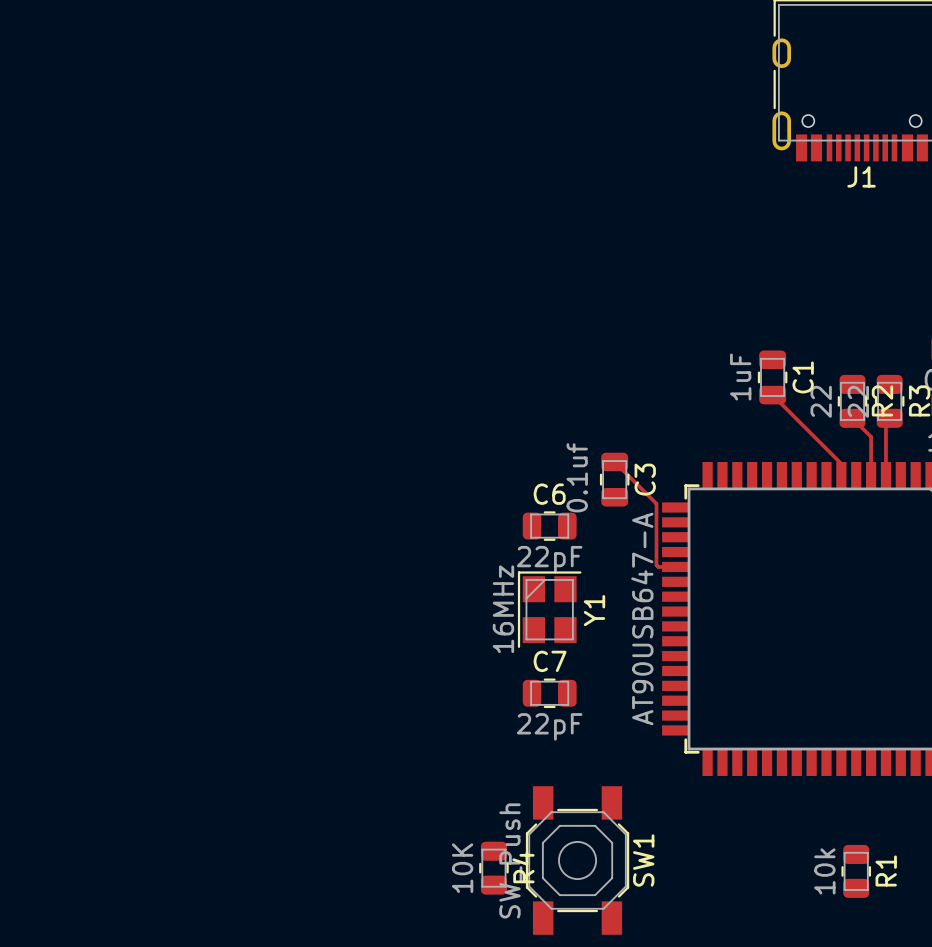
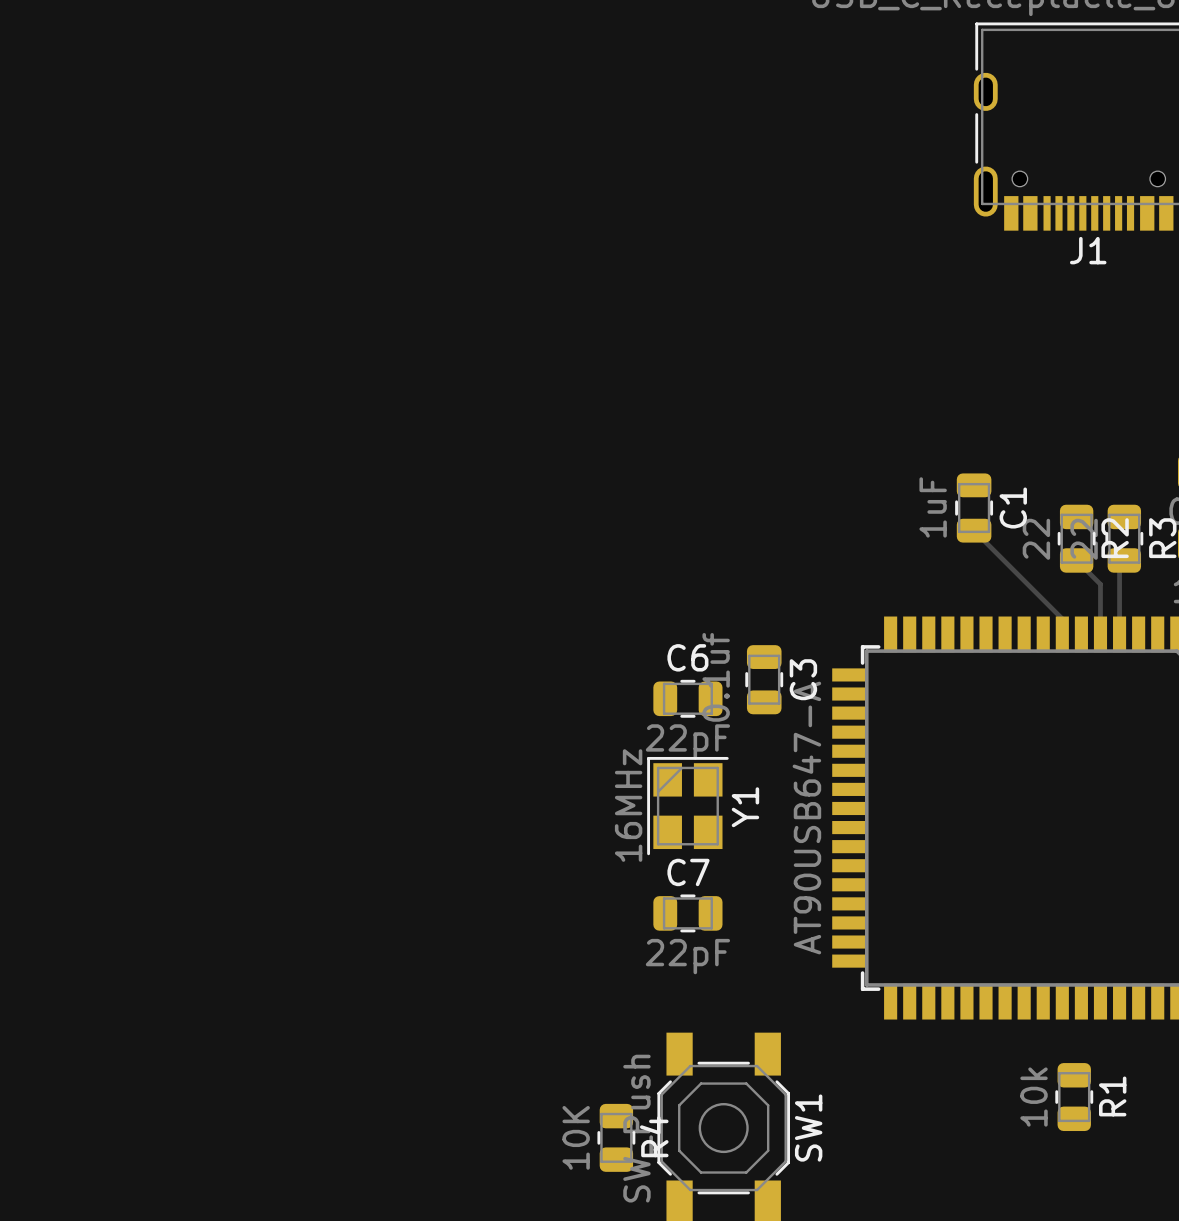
track: (614, 461) (656, 503) (656, 565) (658, 566) (676, 566) -> none
C3 position: (614, 479) -> (764, 679)
R1 position: (856, 871) -> (1074, 1097)

